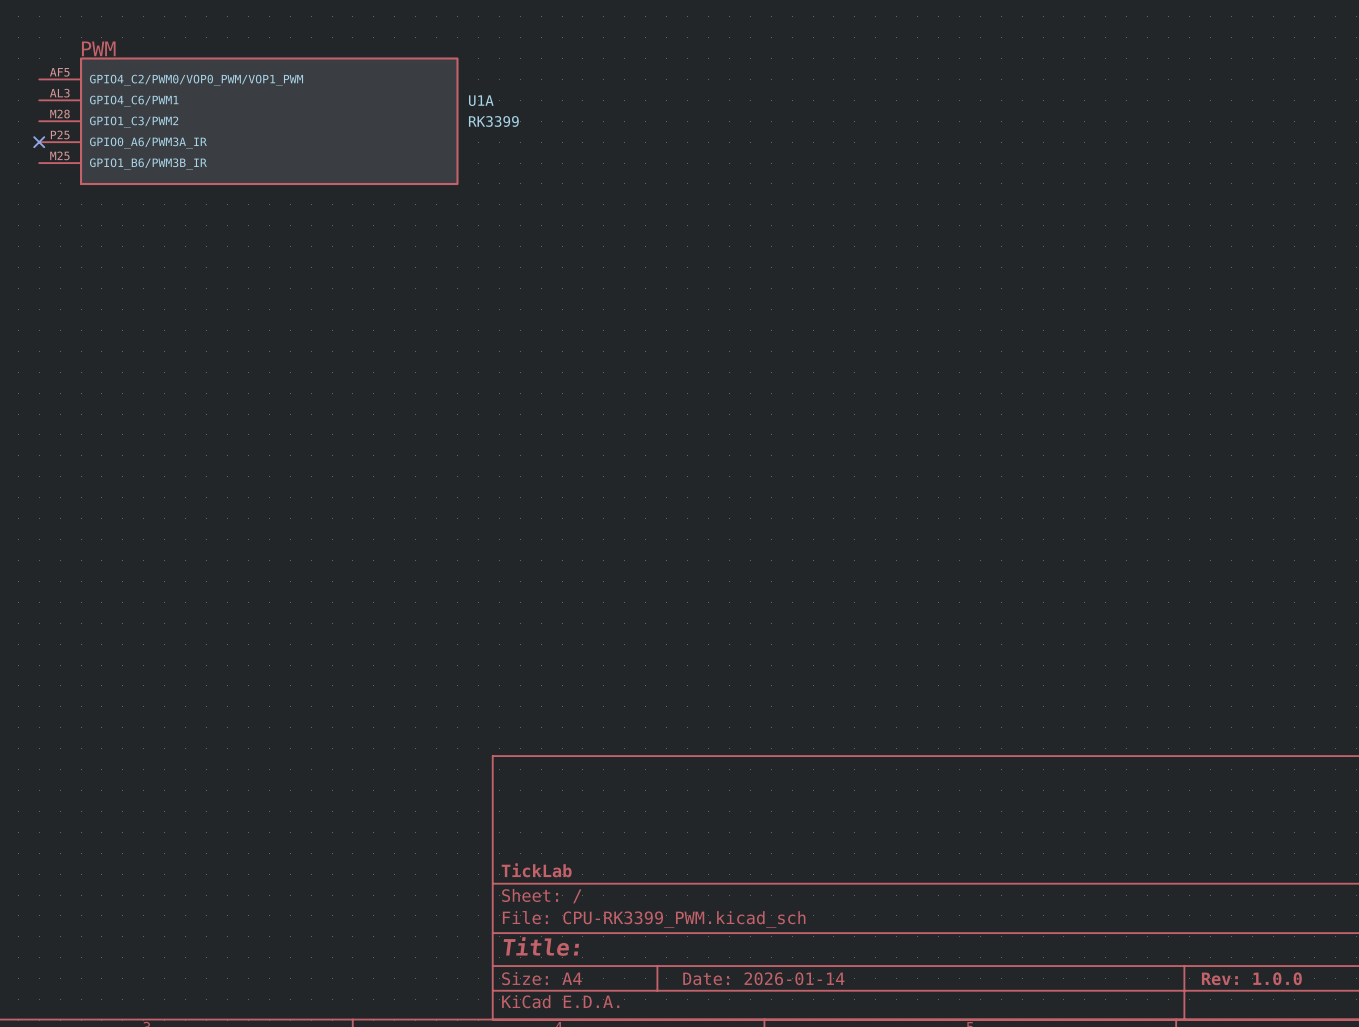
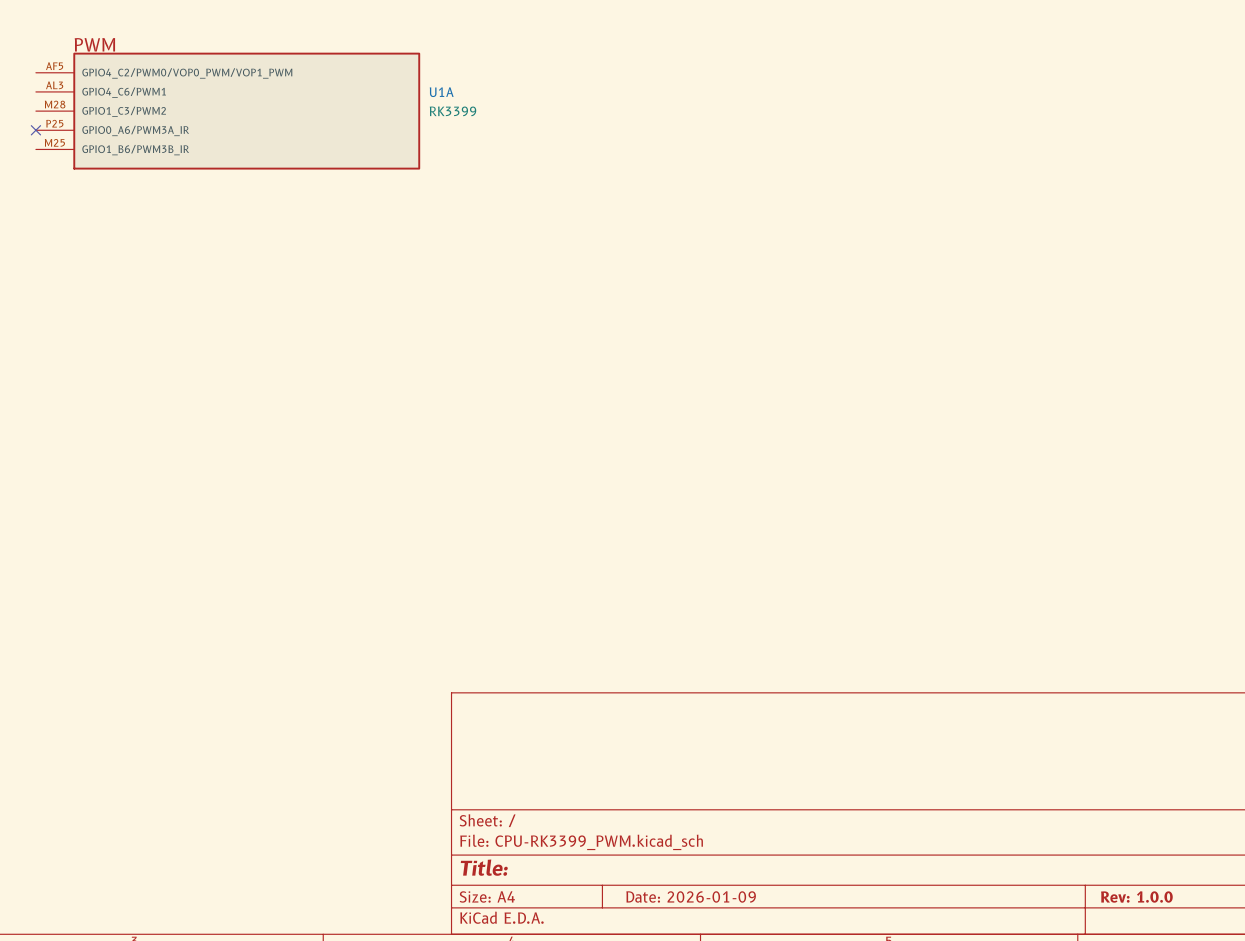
title block: TickLab (536, 870) -> none
title block: Date: 2026-01-14 (763, 978) -> Date: 2026-01-09 (691, 896)

